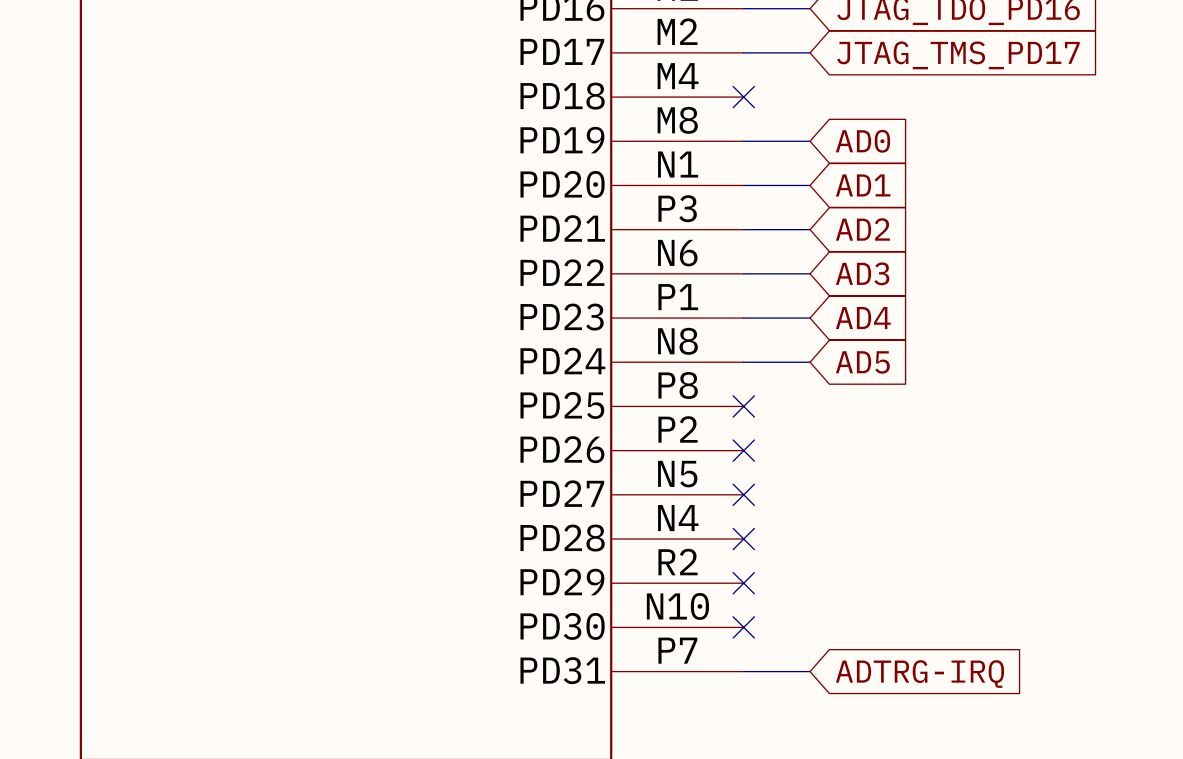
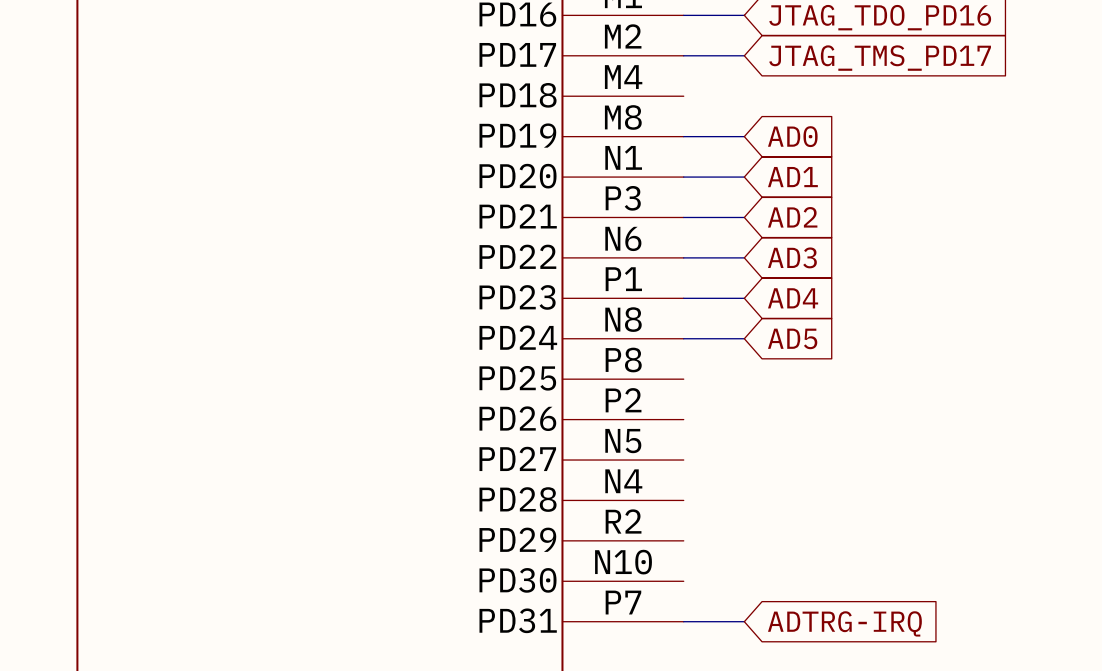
no-connect mark: (743, 97) -> none
no-connect mark: (743, 406) -> none
no-connect mark: (743, 450) -> none
no-connect mark: (743, 494) -> none
no-connect mark: (743, 539) -> none
no-connect mark: (743, 583) -> none
no-connect mark: (743, 627) -> none

